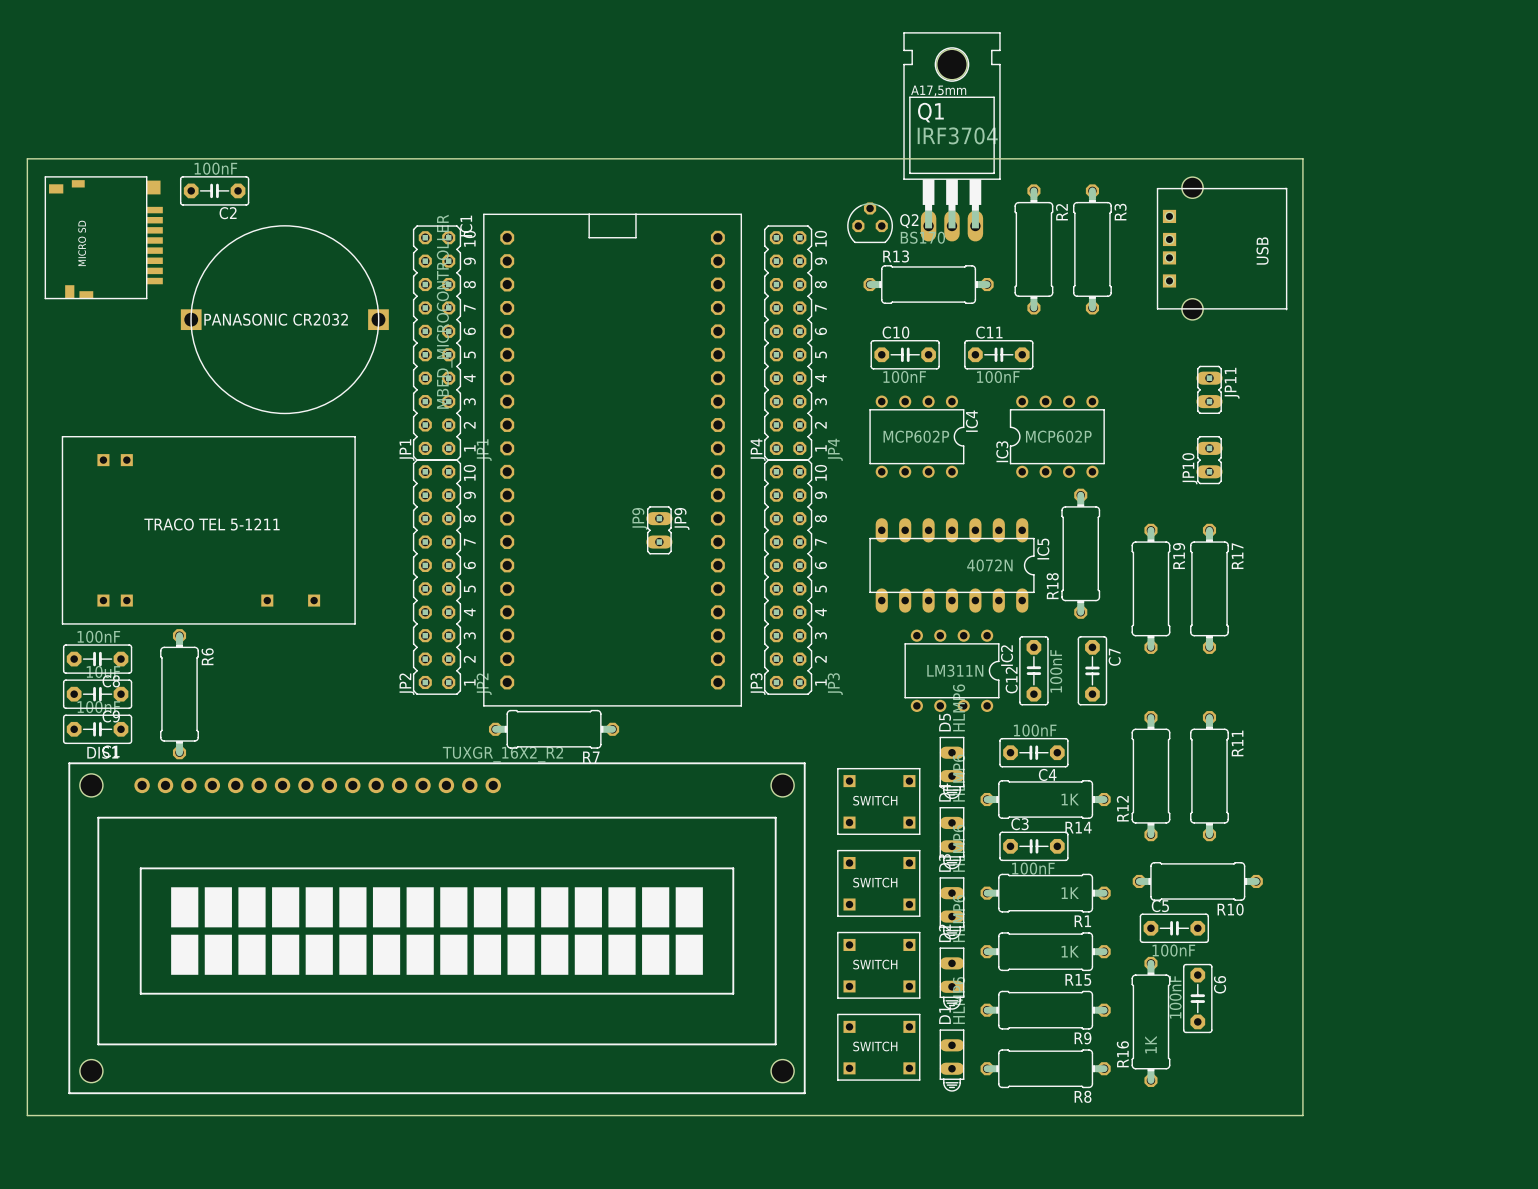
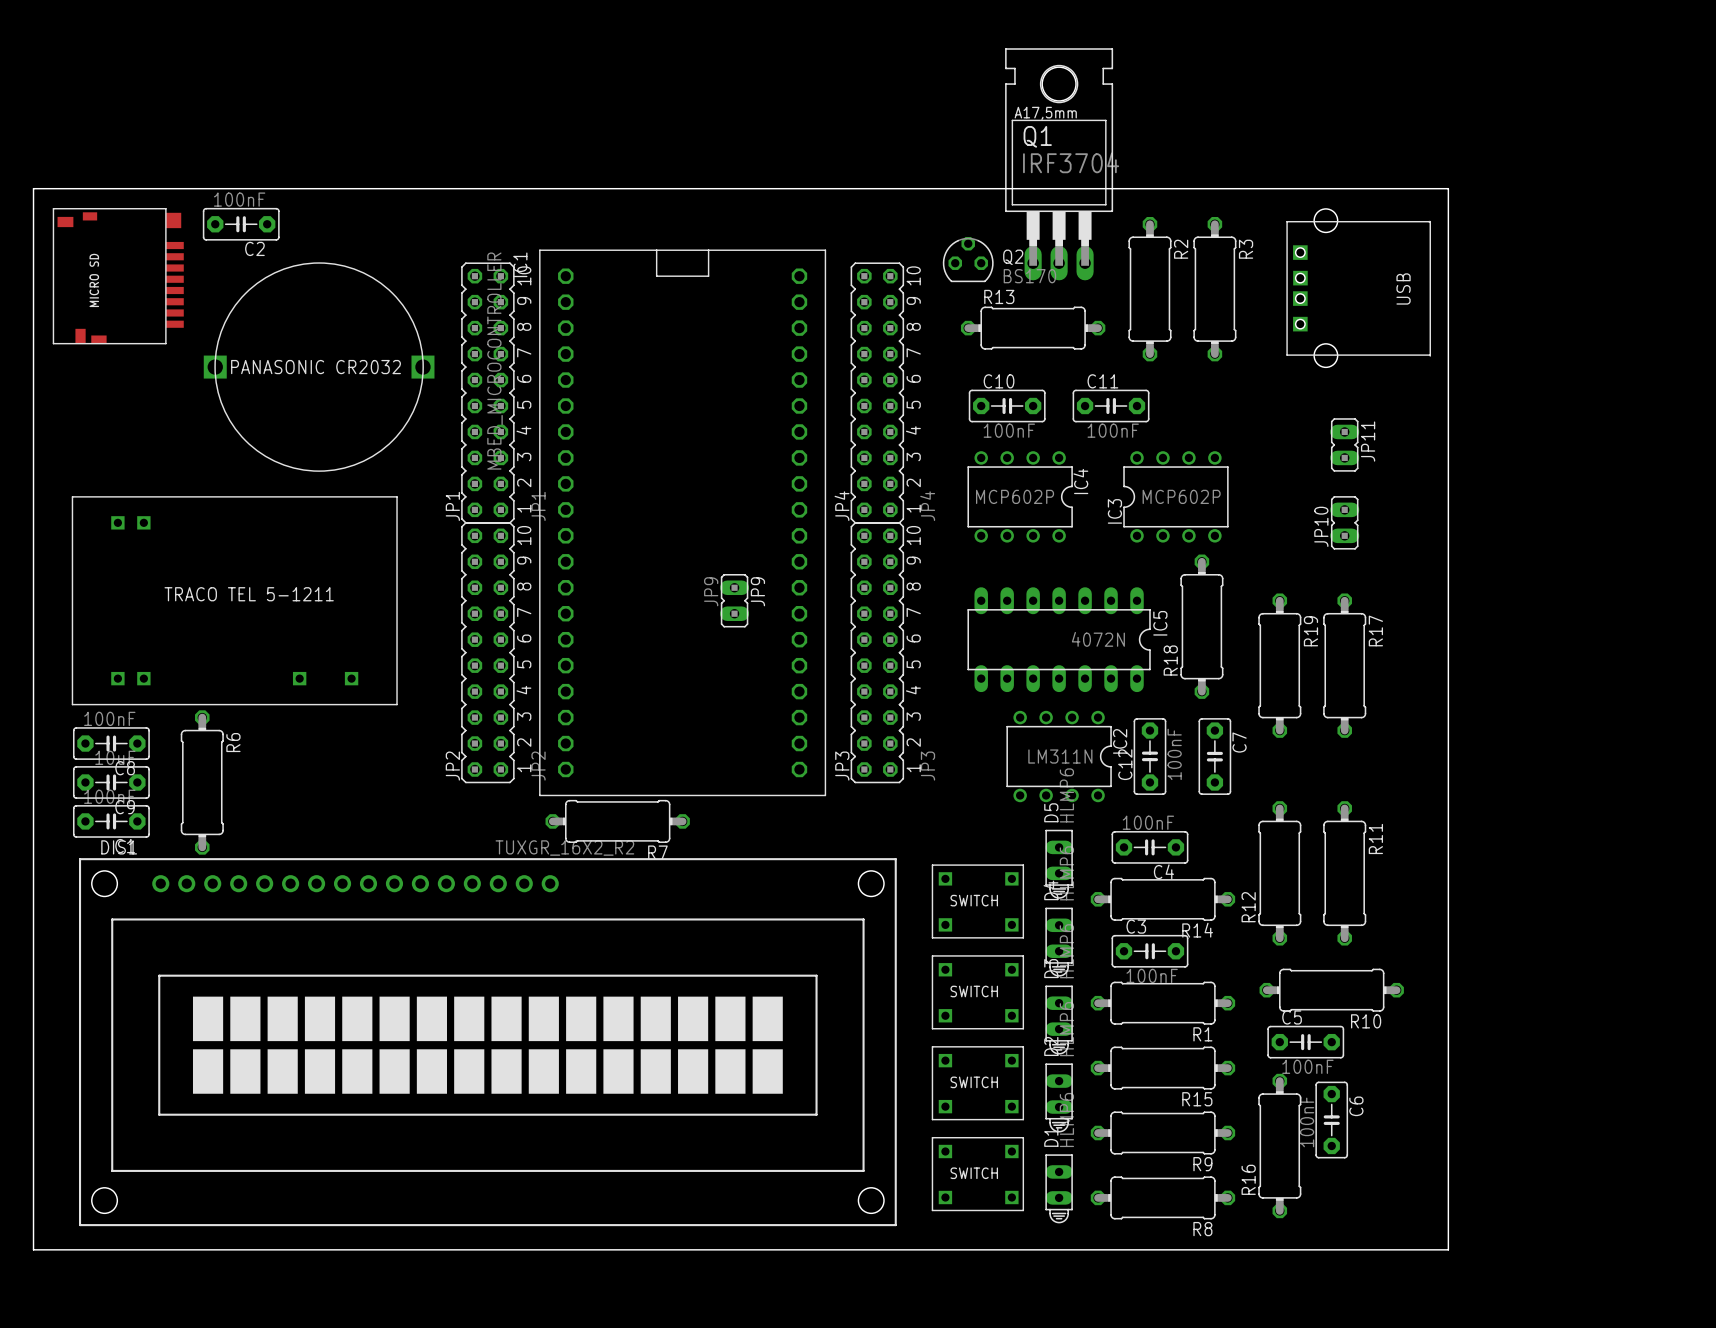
R14 value: 1K (1070, 799) -> none
R1 value: 1K (1070, 893) -> none
R15 value: 1K (1070, 951) -> none
R16 value: 1K (1150, 1044) -> none

